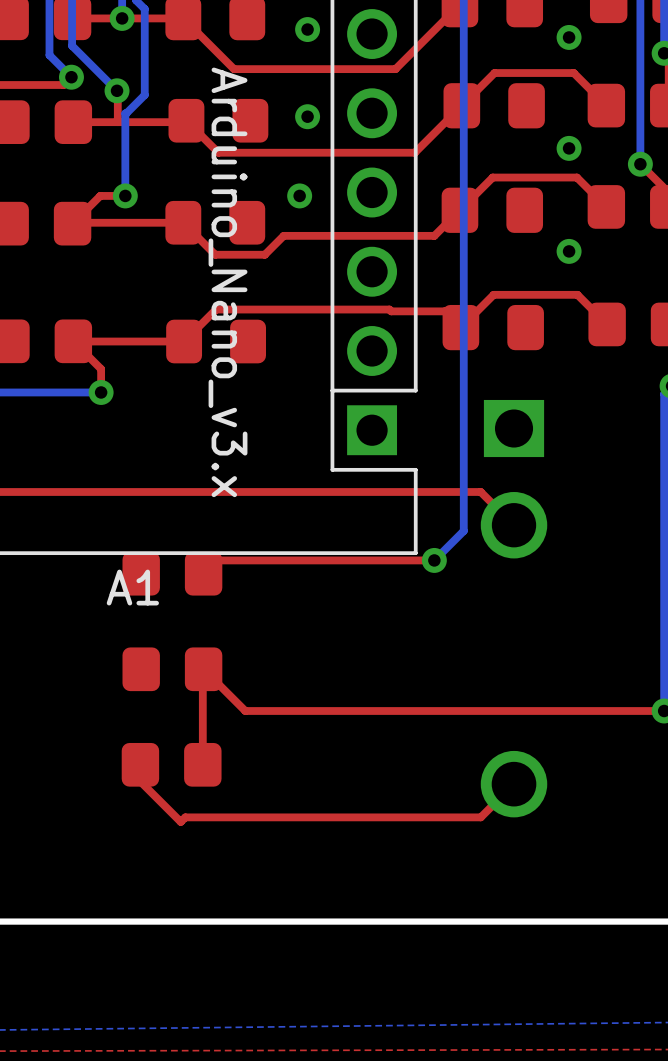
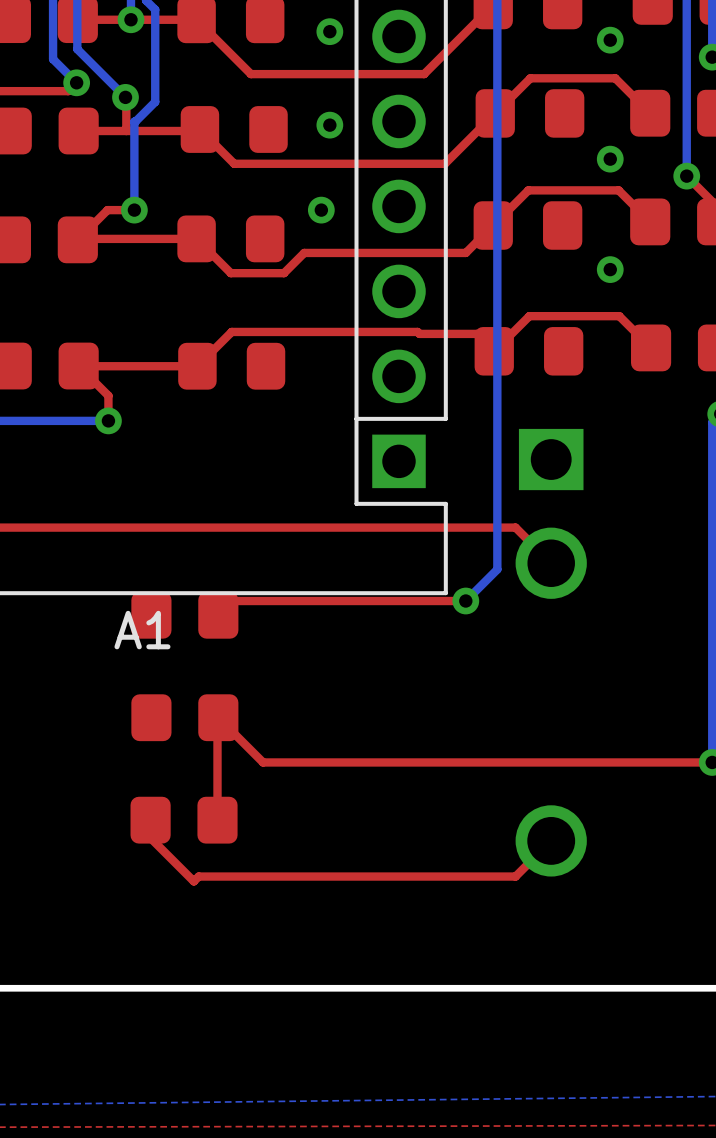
A1 value: Arduino_Nano_v3.x (228, 282) -> none

